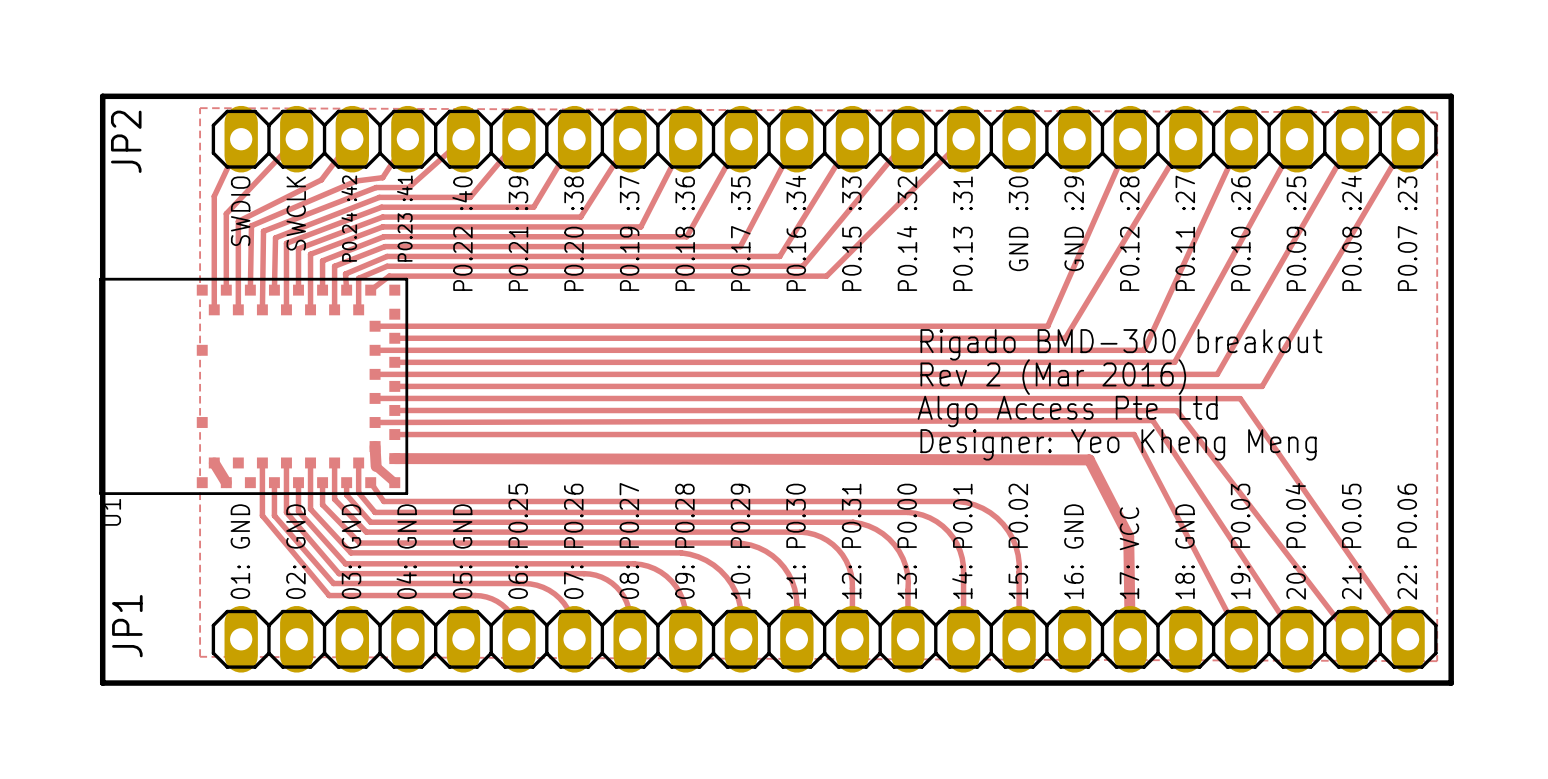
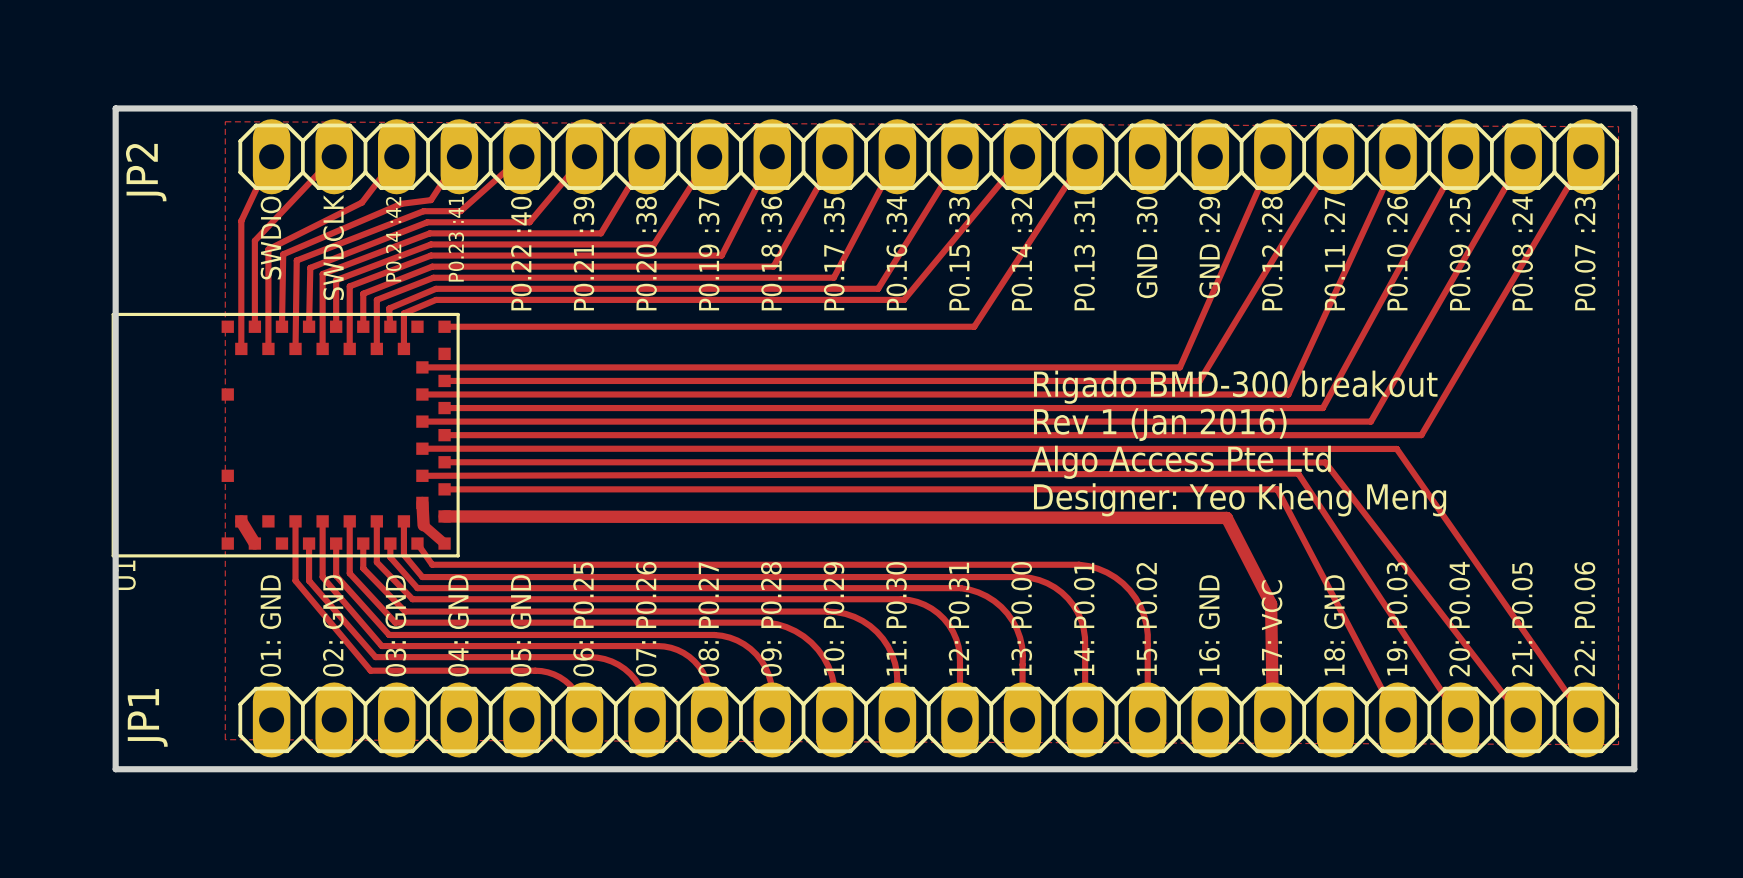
track: (963, 139) (826, 276) (389, 276) (370, 290) -> (1085, 156) (974, 326) (444, 326)
text: SWCLK (296, 213) -> SWDCLK (333, 247)
text: Rev 2 (Mar 2016) (1053, 377) -> Rev 1 (Jan 2016) (1160, 424)

